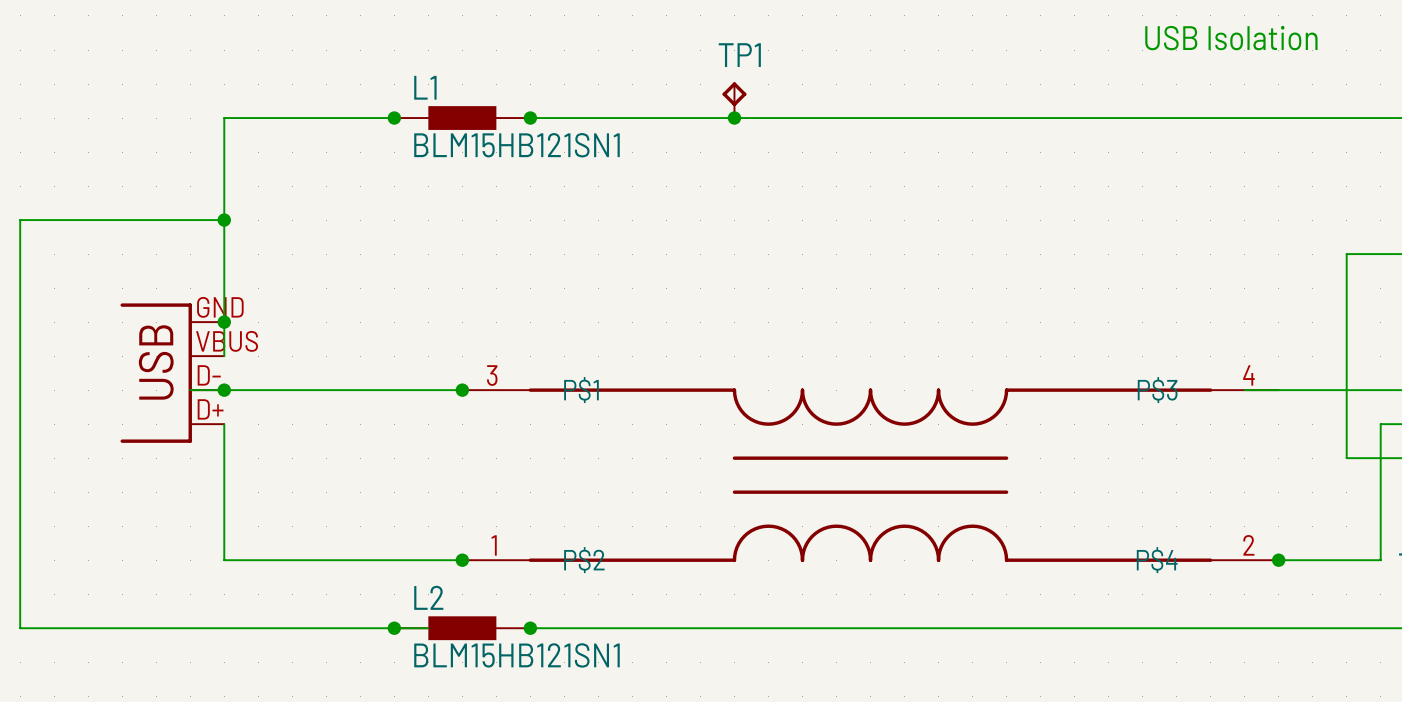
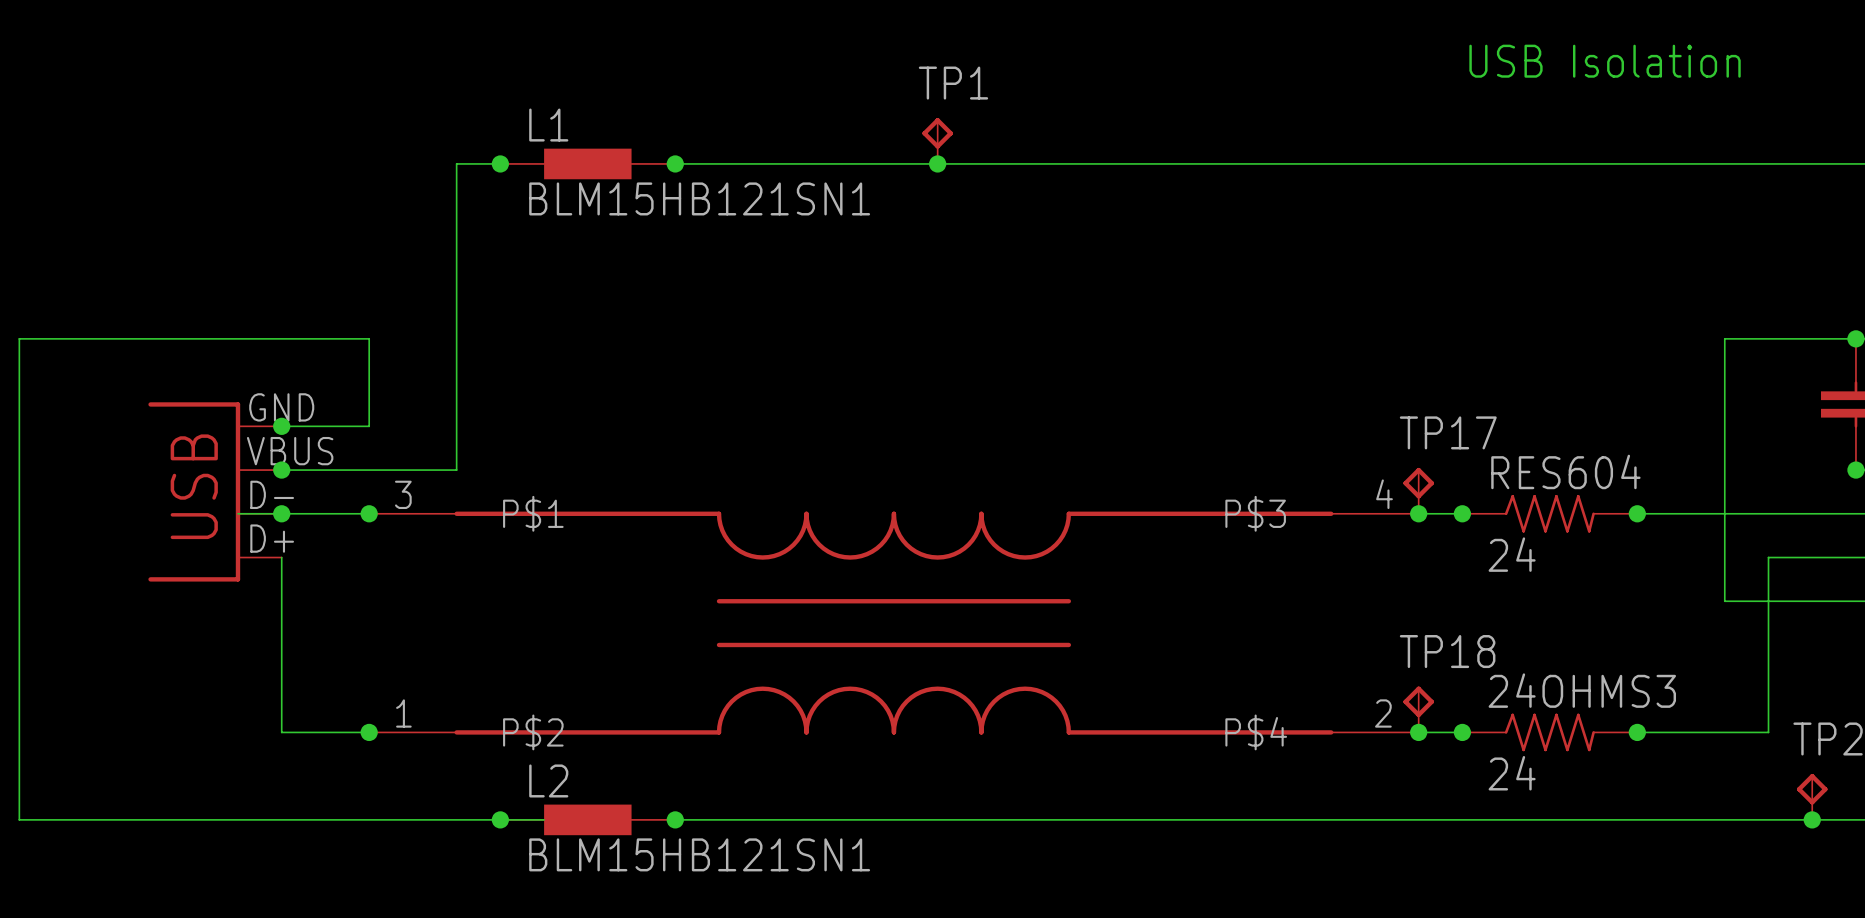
wire: (360, 118) (224, 118) (224, 356) -> (456, 163) (456, 470) (281, 470)
wire: (224, 220) (20, 220) (20, 254) -> (281, 426) (369, 426) (369, 338) (19, 338)
junction: (224, 220) -> none
junction: none -> (281, 470)
TP17: none -> (1418, 490)
junction: none -> (369, 513)
junction: (462, 390) -> none
junction: none -> (1418, 513)
junction: none -> (1462, 513)
RES604: none -> 24 (1549, 513)
junction: none -> (1637, 513)
part position: (870, 475) -> (893, 623)
TP18: none -> (1418, 709)
junction: none -> (369, 732)
junction: (462, 560) -> none
junction: none -> (1418, 732)
junction: none -> (1462, 732)
24OHMS3: none -> 24 (1549, 732)

